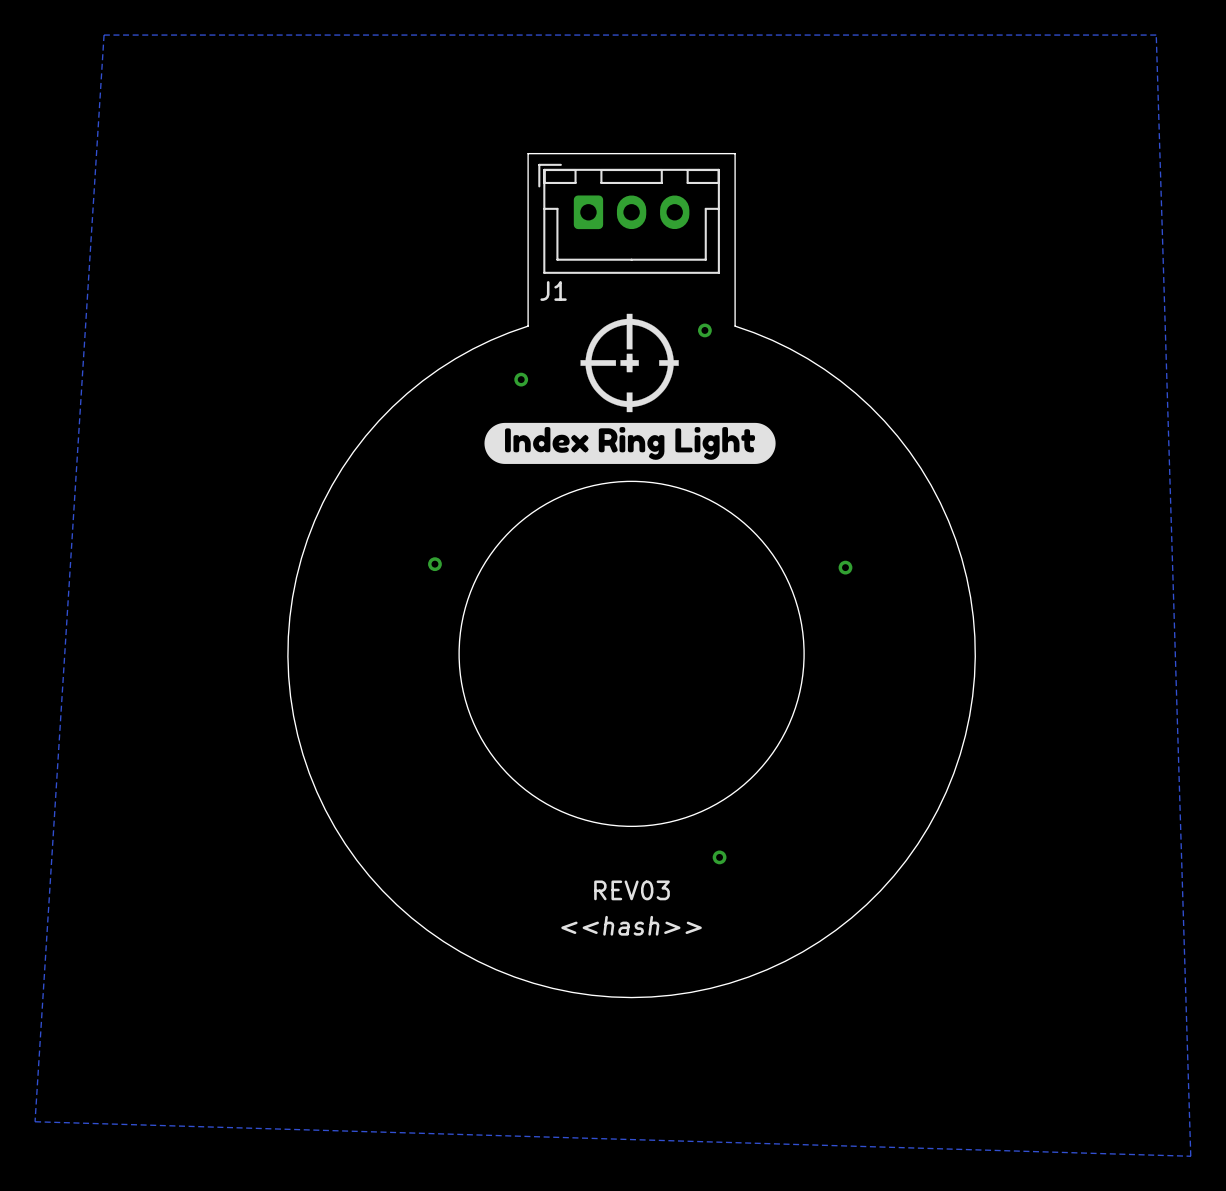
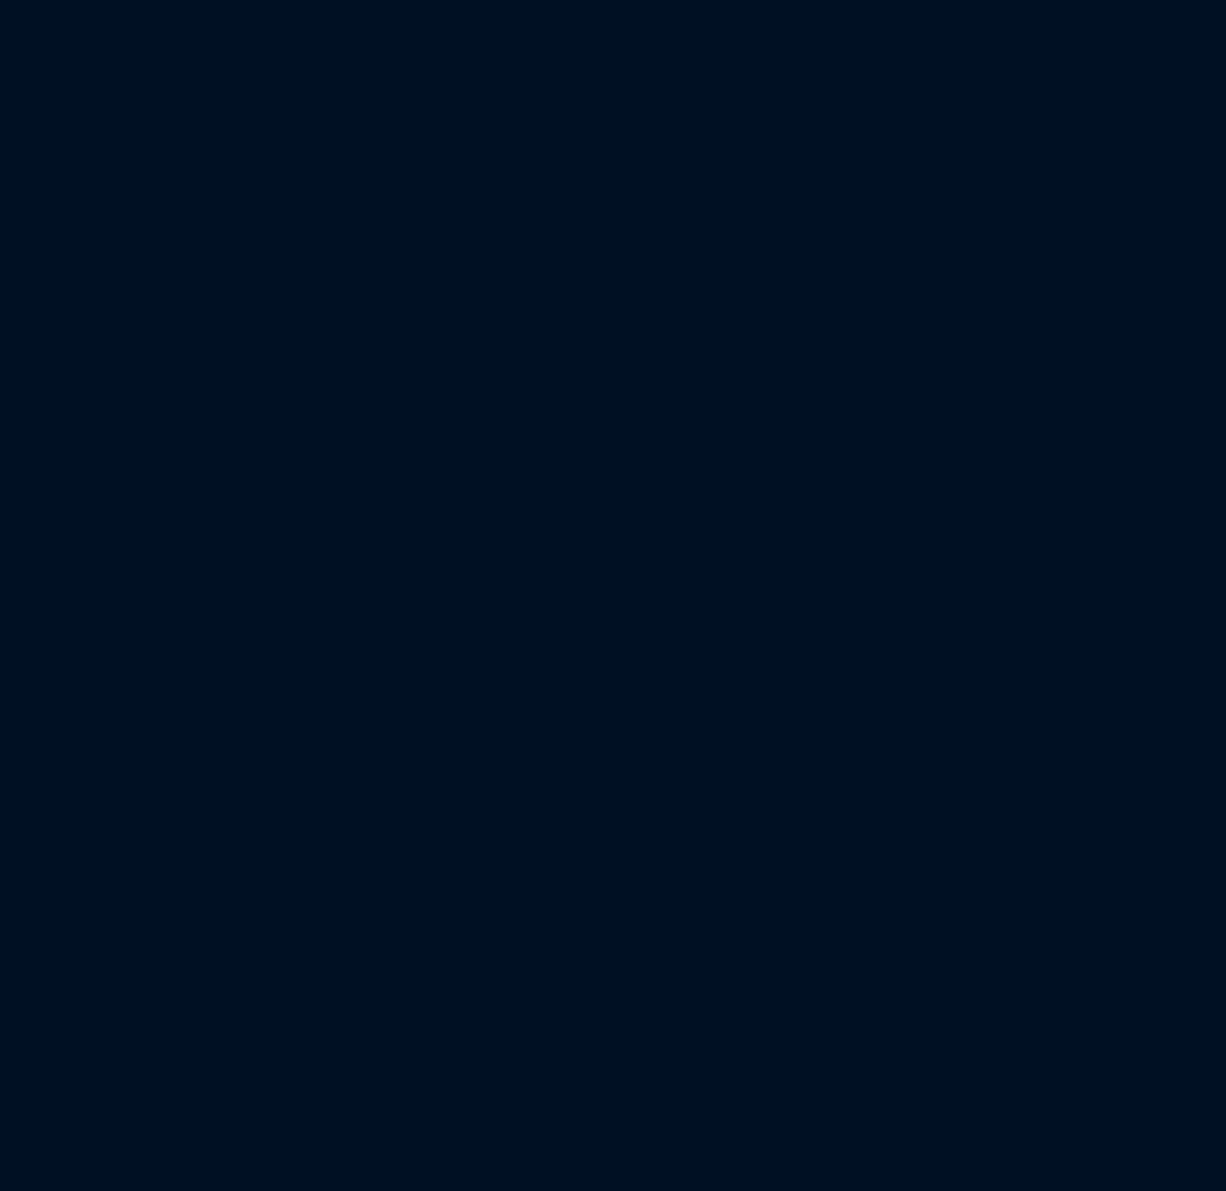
zone outline: (1156, 35) (1190, 1156) (35, 1121) (104, 35) (1156, 35) -> none
board edge: (735, 153) (528, 153) (528, 326) (490, 340) (455, 358) (422, 380) (378, 421) (353, 451) (332, 485) (307, 539) (296, 577) (288, 636) (290, 696) (297, 735) (309, 773) (334, 827) (369, 875) (396, 904) (427, 930) (460, 951) (496, 969) (552, 988) (591, 995) (631, 997) (690, 992) (748, 977) (802, 951) (835, 930) (866, 904) (906, 860) (928, 827) (946, 791) (965, 735) (974, 676) (973, 616) (966, 577) (955, 539) (931, 485) (909, 451) (884, 421) (840, 380) (790, 348) (735, 326) (735, 153) -> none
J1: (629, 218) -> none
drawing: [484, 313, 776, 464] -> none
via: (704, 330) -> none
via: (521, 379) -> none
round board edge: [458, 480, 805, 827] -> none
via: (434, 564) -> none
via: (845, 567) -> none
via: (719, 857) -> none
text: REV03 (632, 890) -> none
text: <<hash>> (631, 925) -> none

